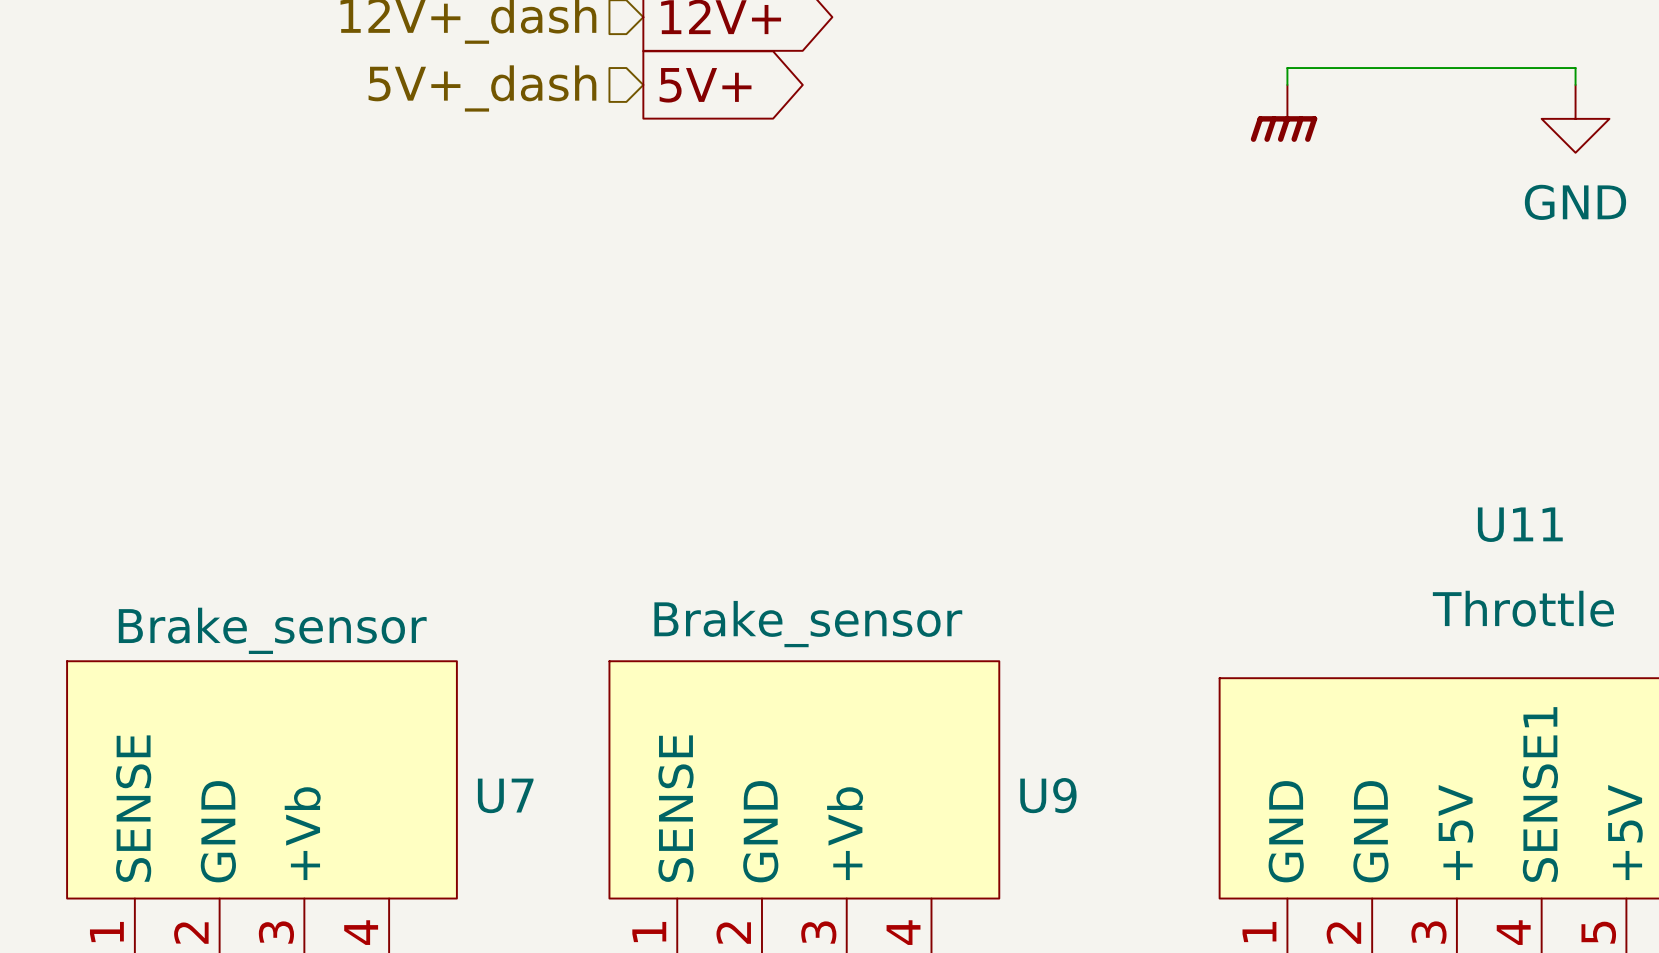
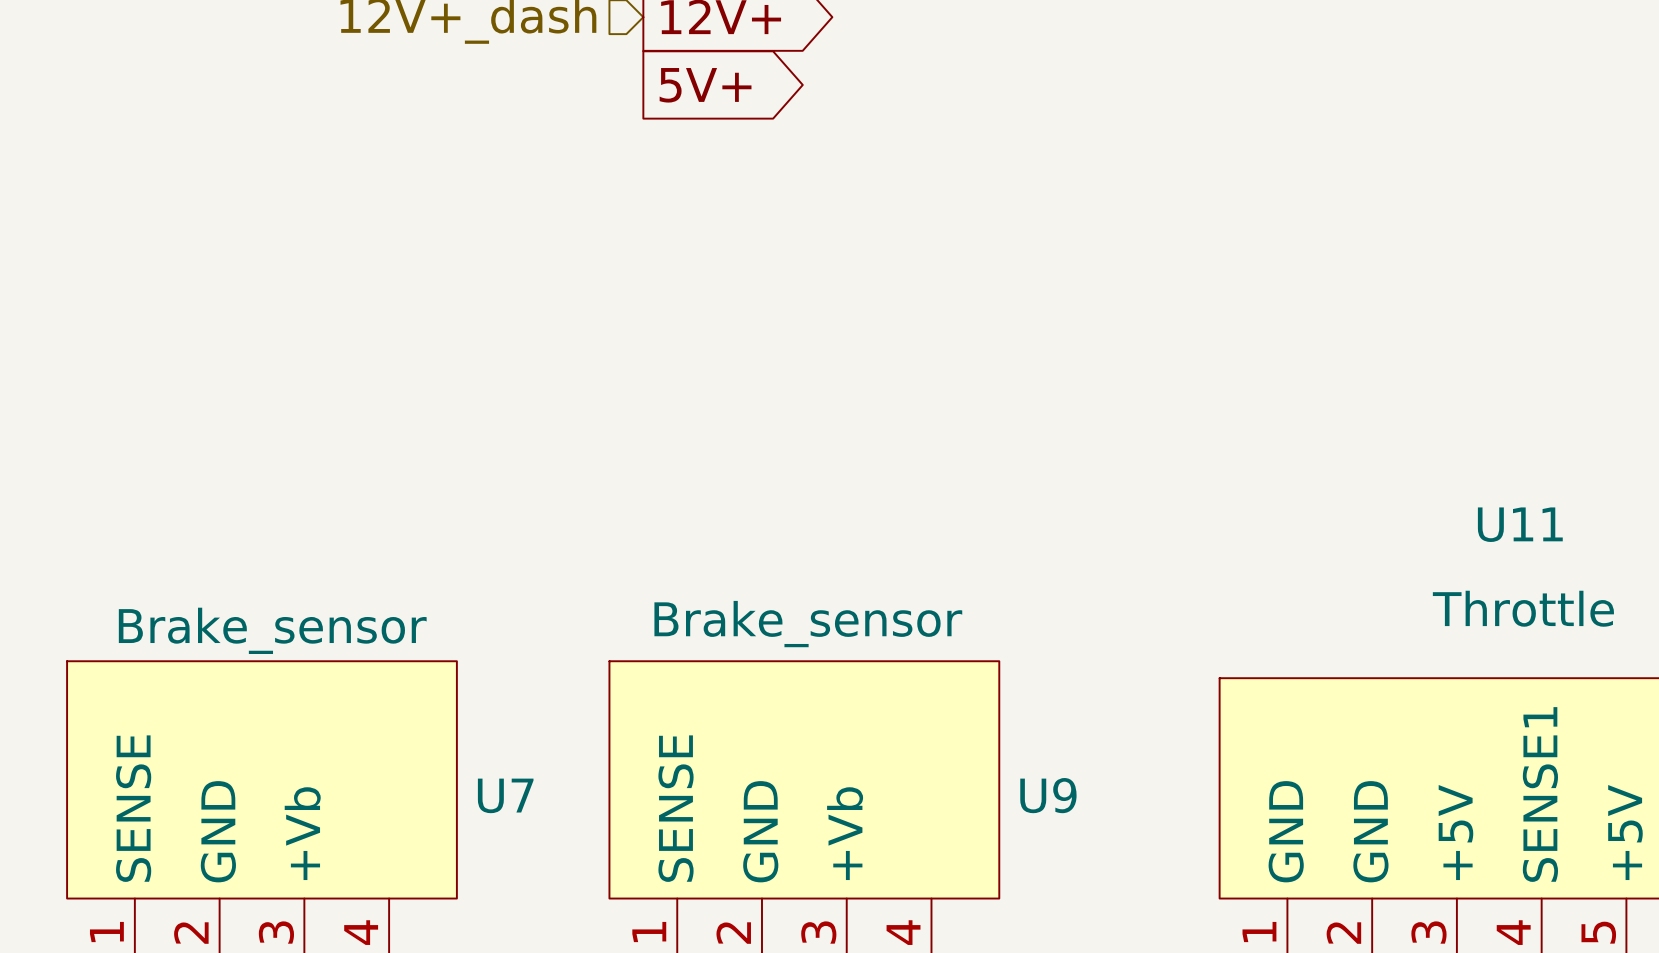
wire: (1287, 84) (1287, 68) (1575, 68) (1575, 84) -> none
hierarchical label: 5V+_dash (482, 88) -> none
power symbol: (1284, 113) -> none
power symbol: GND (1575, 118) -> none

